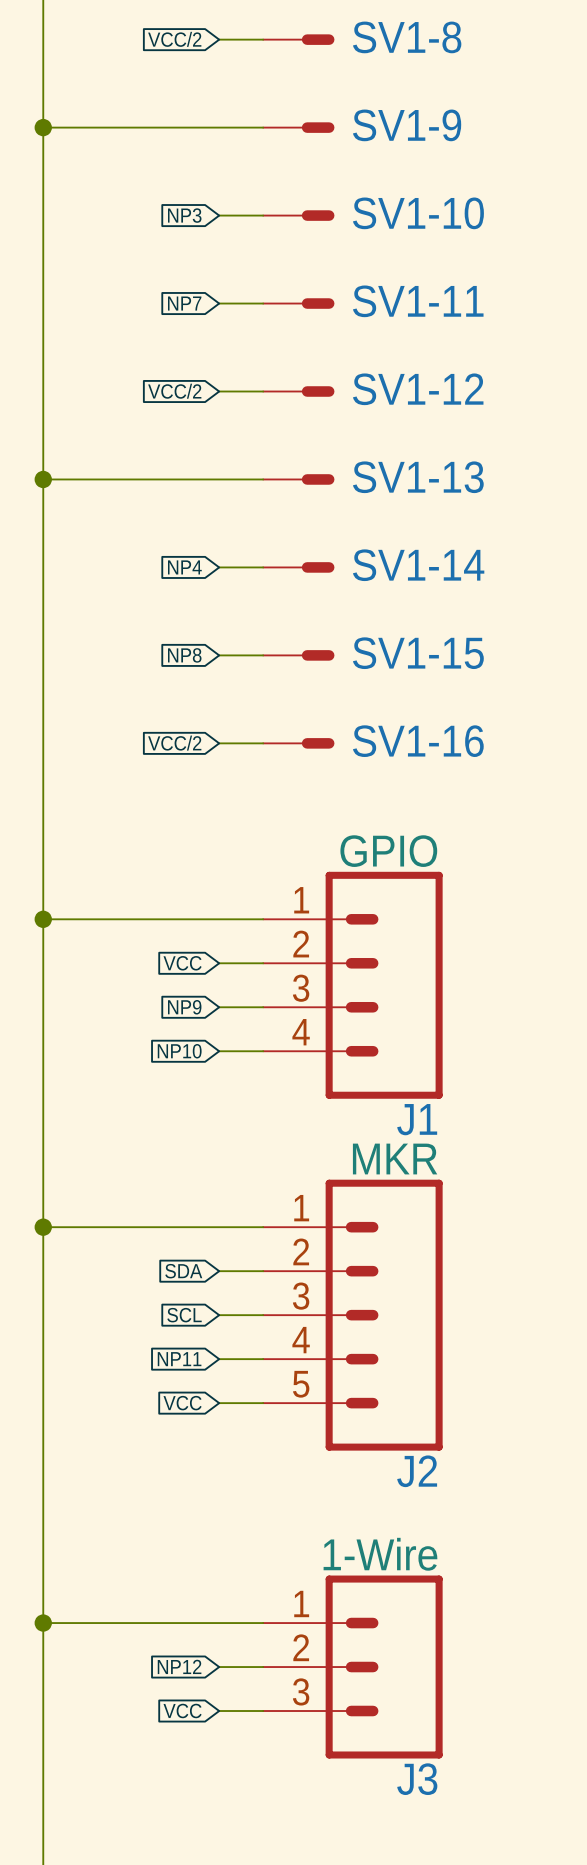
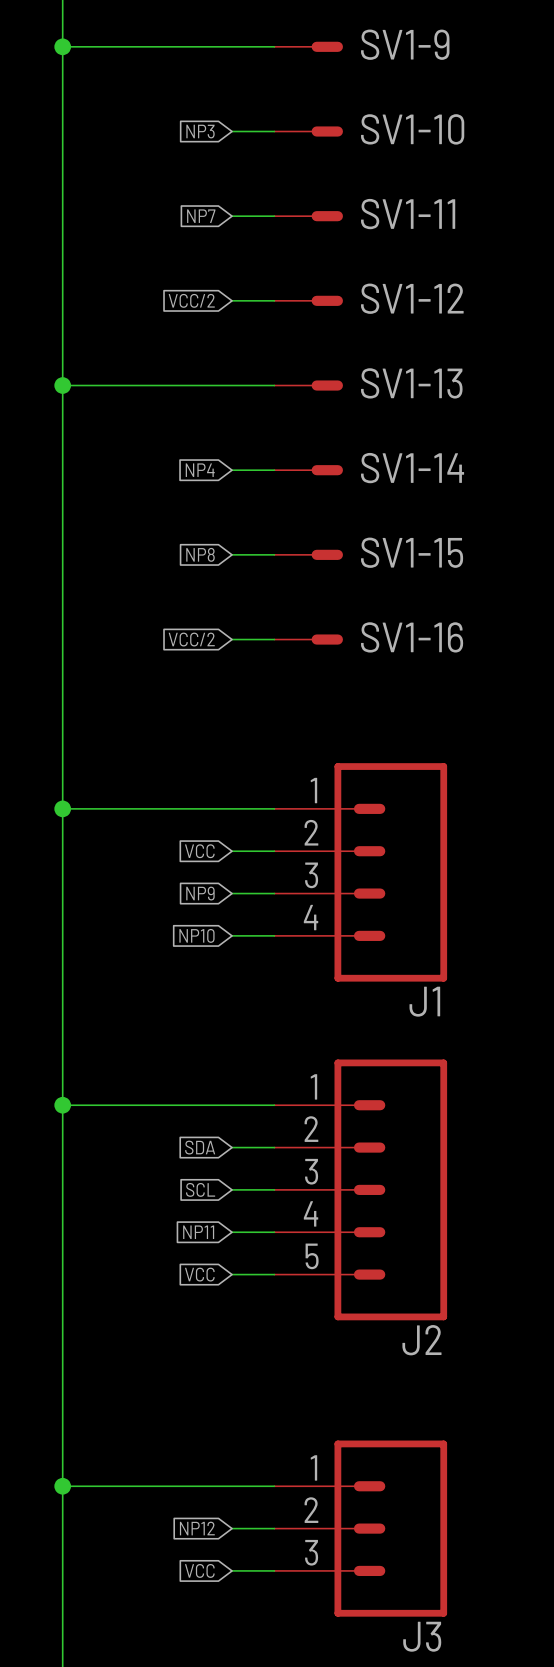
J1 value: GPIO (388, 851) -> none
J2 value: MKR (395, 1159) -> none
J3 value: 1-Wire (380, 1554) -> none

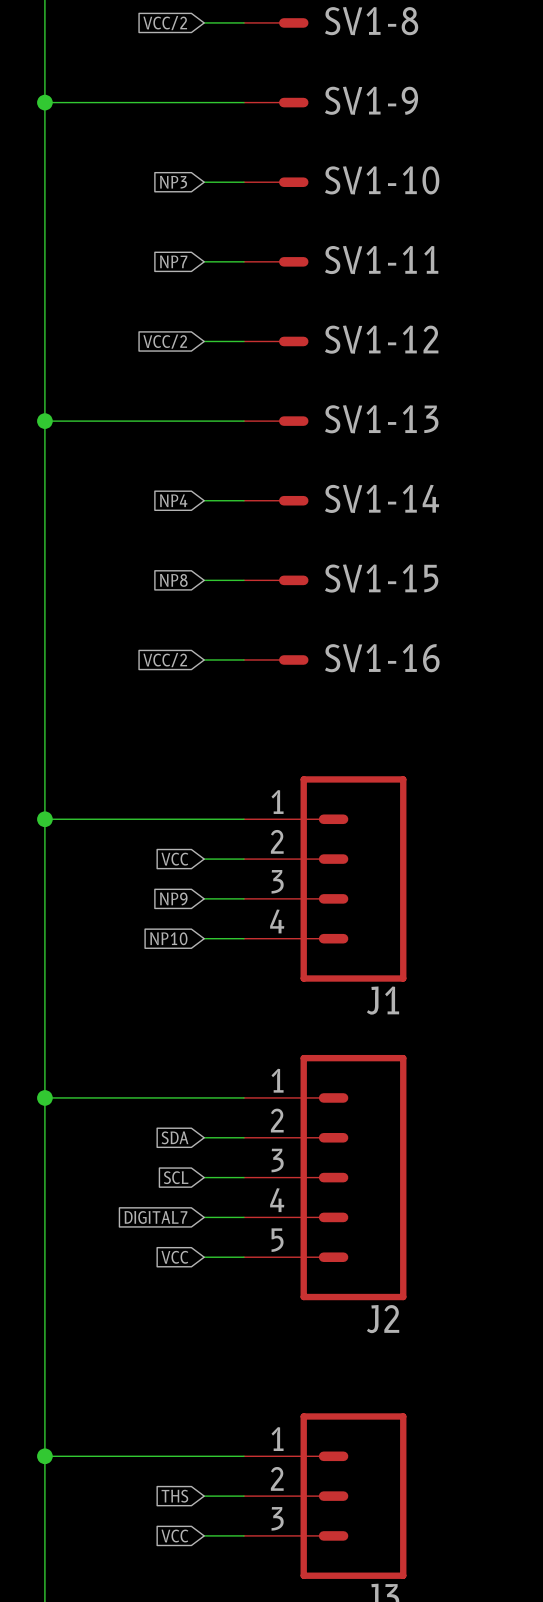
global label: NP11 (198, 1232) -> DIGITAL7 (155, 1217)
global label: NP12 (197, 1528) -> THS (174, 1496)

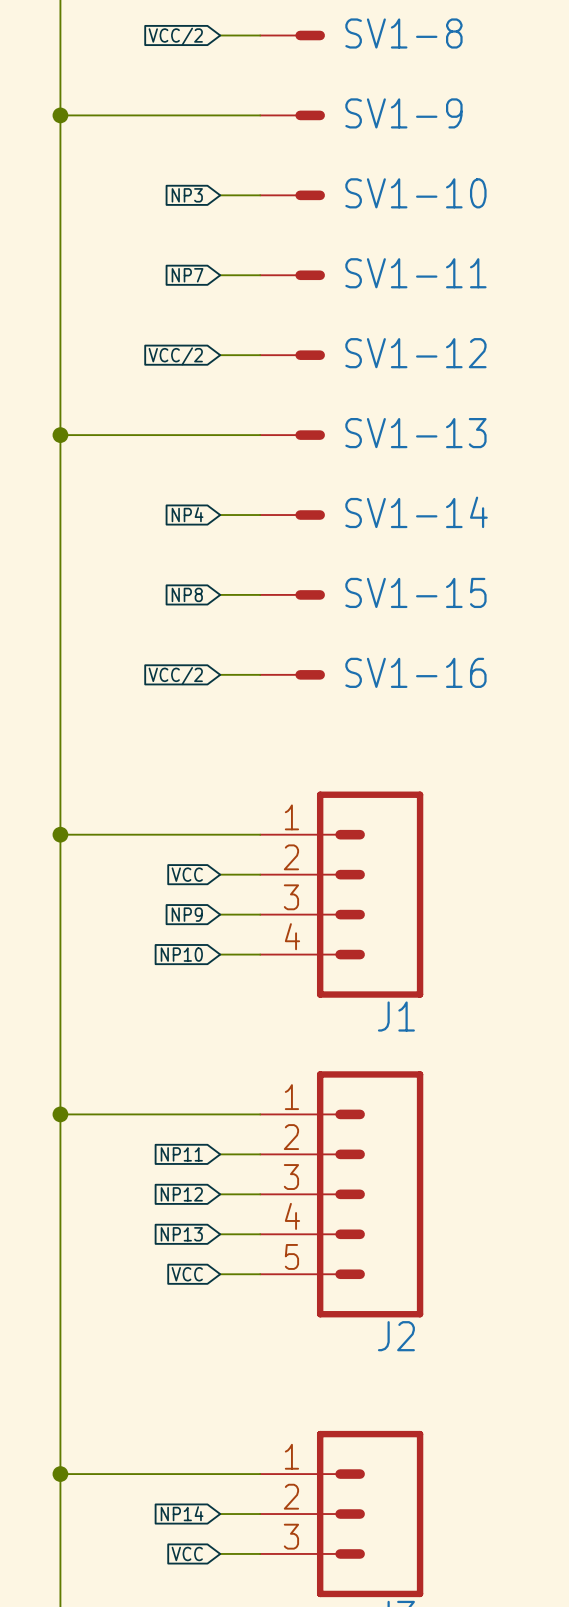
global label: SDA (175, 1137) -> NP11 (181, 1154)
global label: SCL (176, 1177) -> NP12 (181, 1194)
global label: DIGITAL7 (155, 1217) -> NP13 (181, 1234)
global label: THS (174, 1496) -> NP14 (182, 1513)

